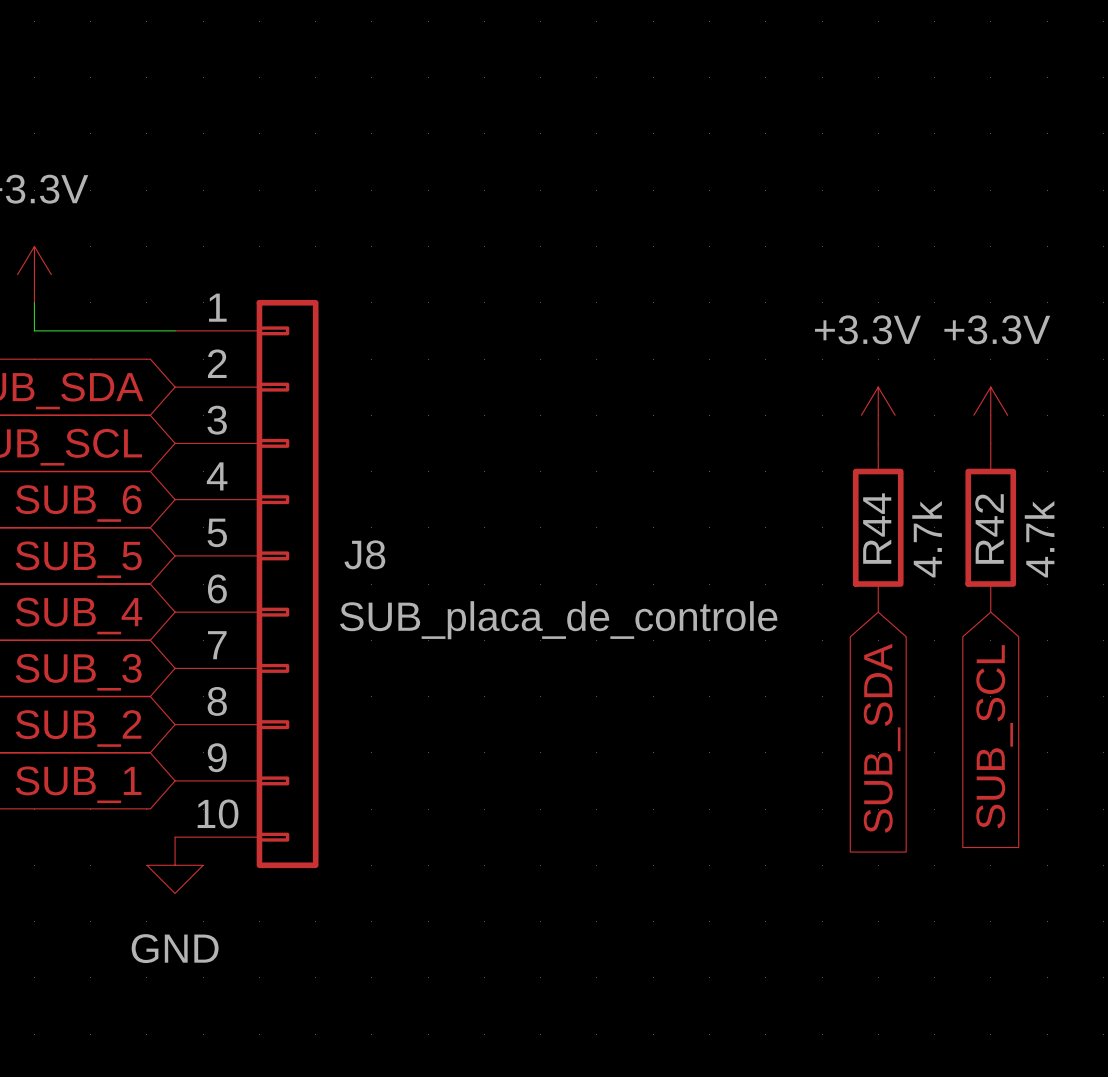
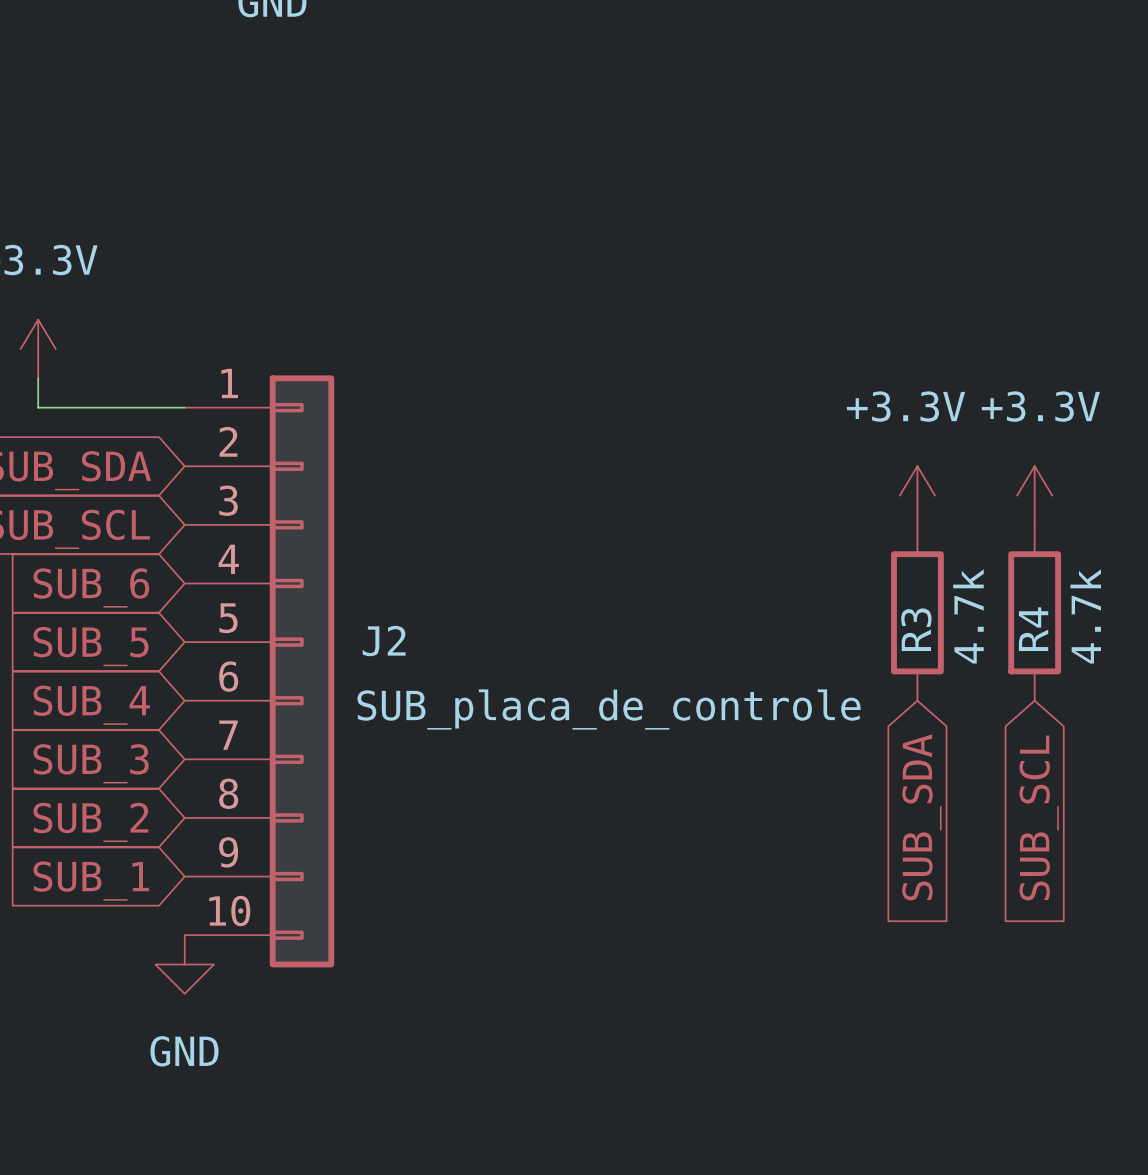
R44 name: R44 (877, 528) -> R3 (916, 629)
R42 name: R42 (989, 528) -> R4 (1033, 629)
J8 name: J8 (364, 554) -> J2 (384, 641)

